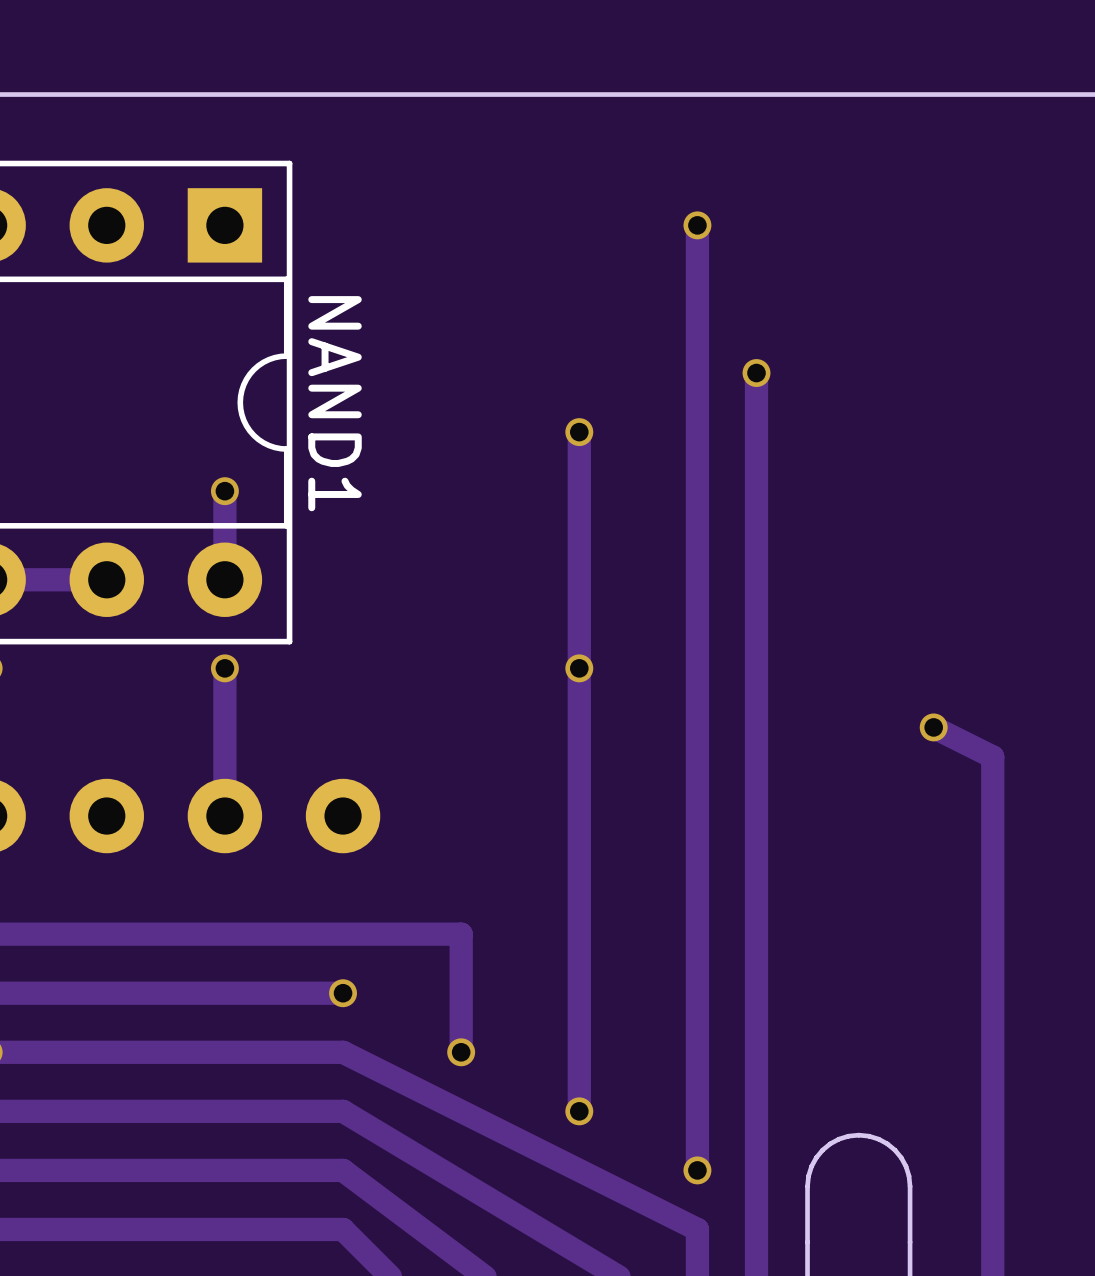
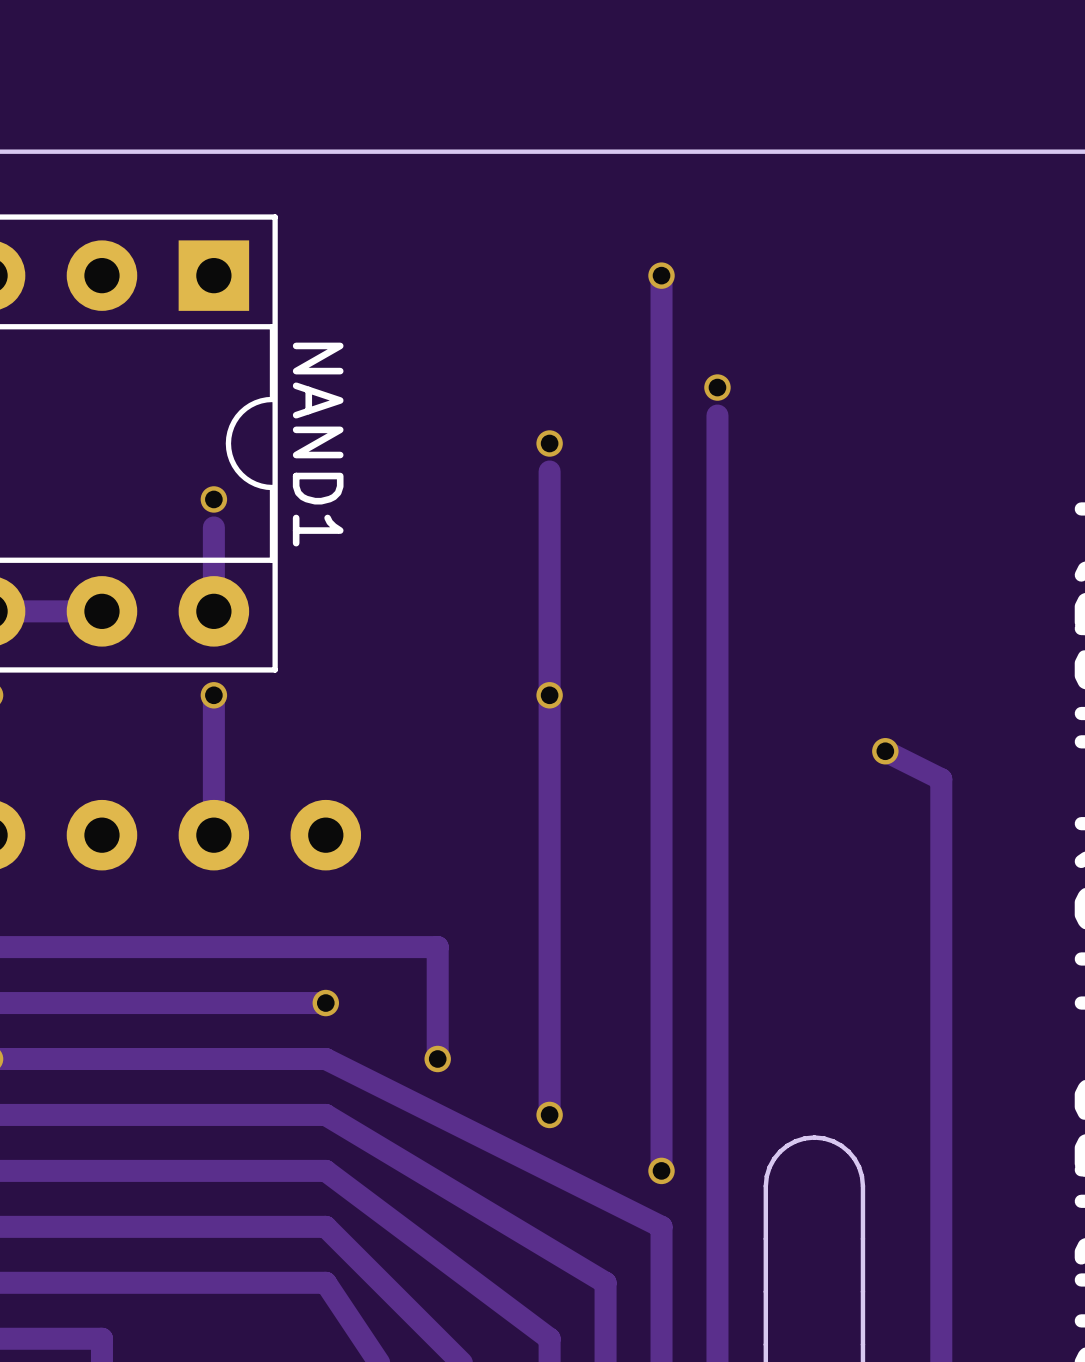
via position: (756, 373) -> (717, 387)
via position: (579, 432) -> (549, 443)
via position: (224, 491) -> (213, 499)

